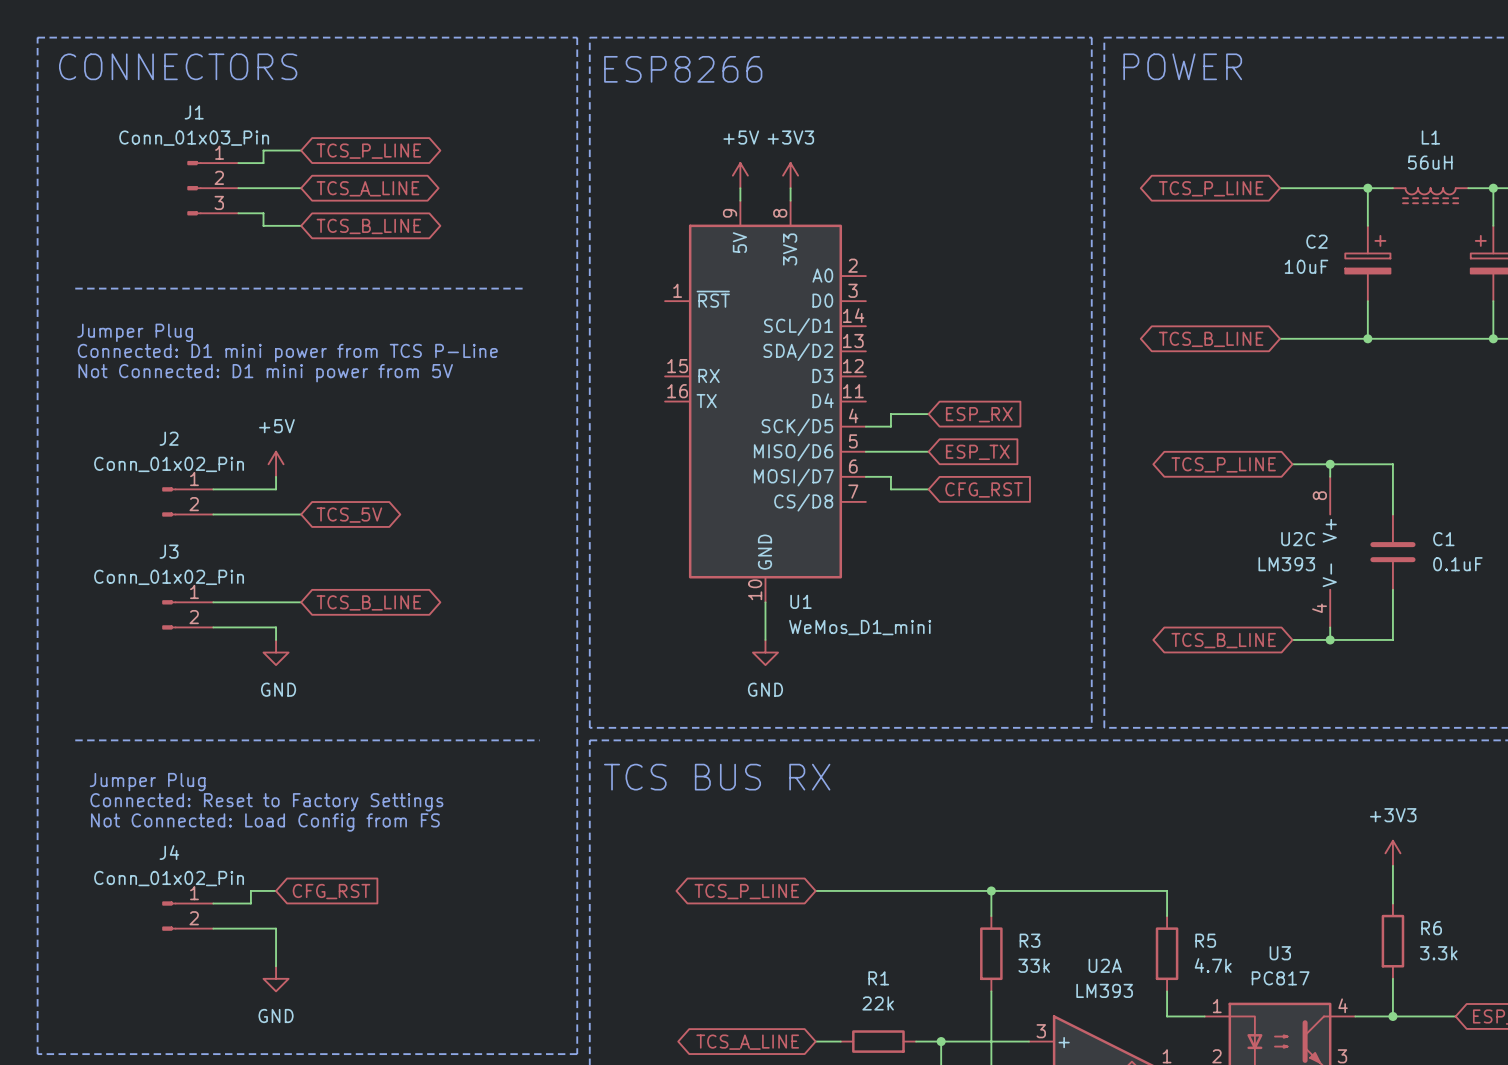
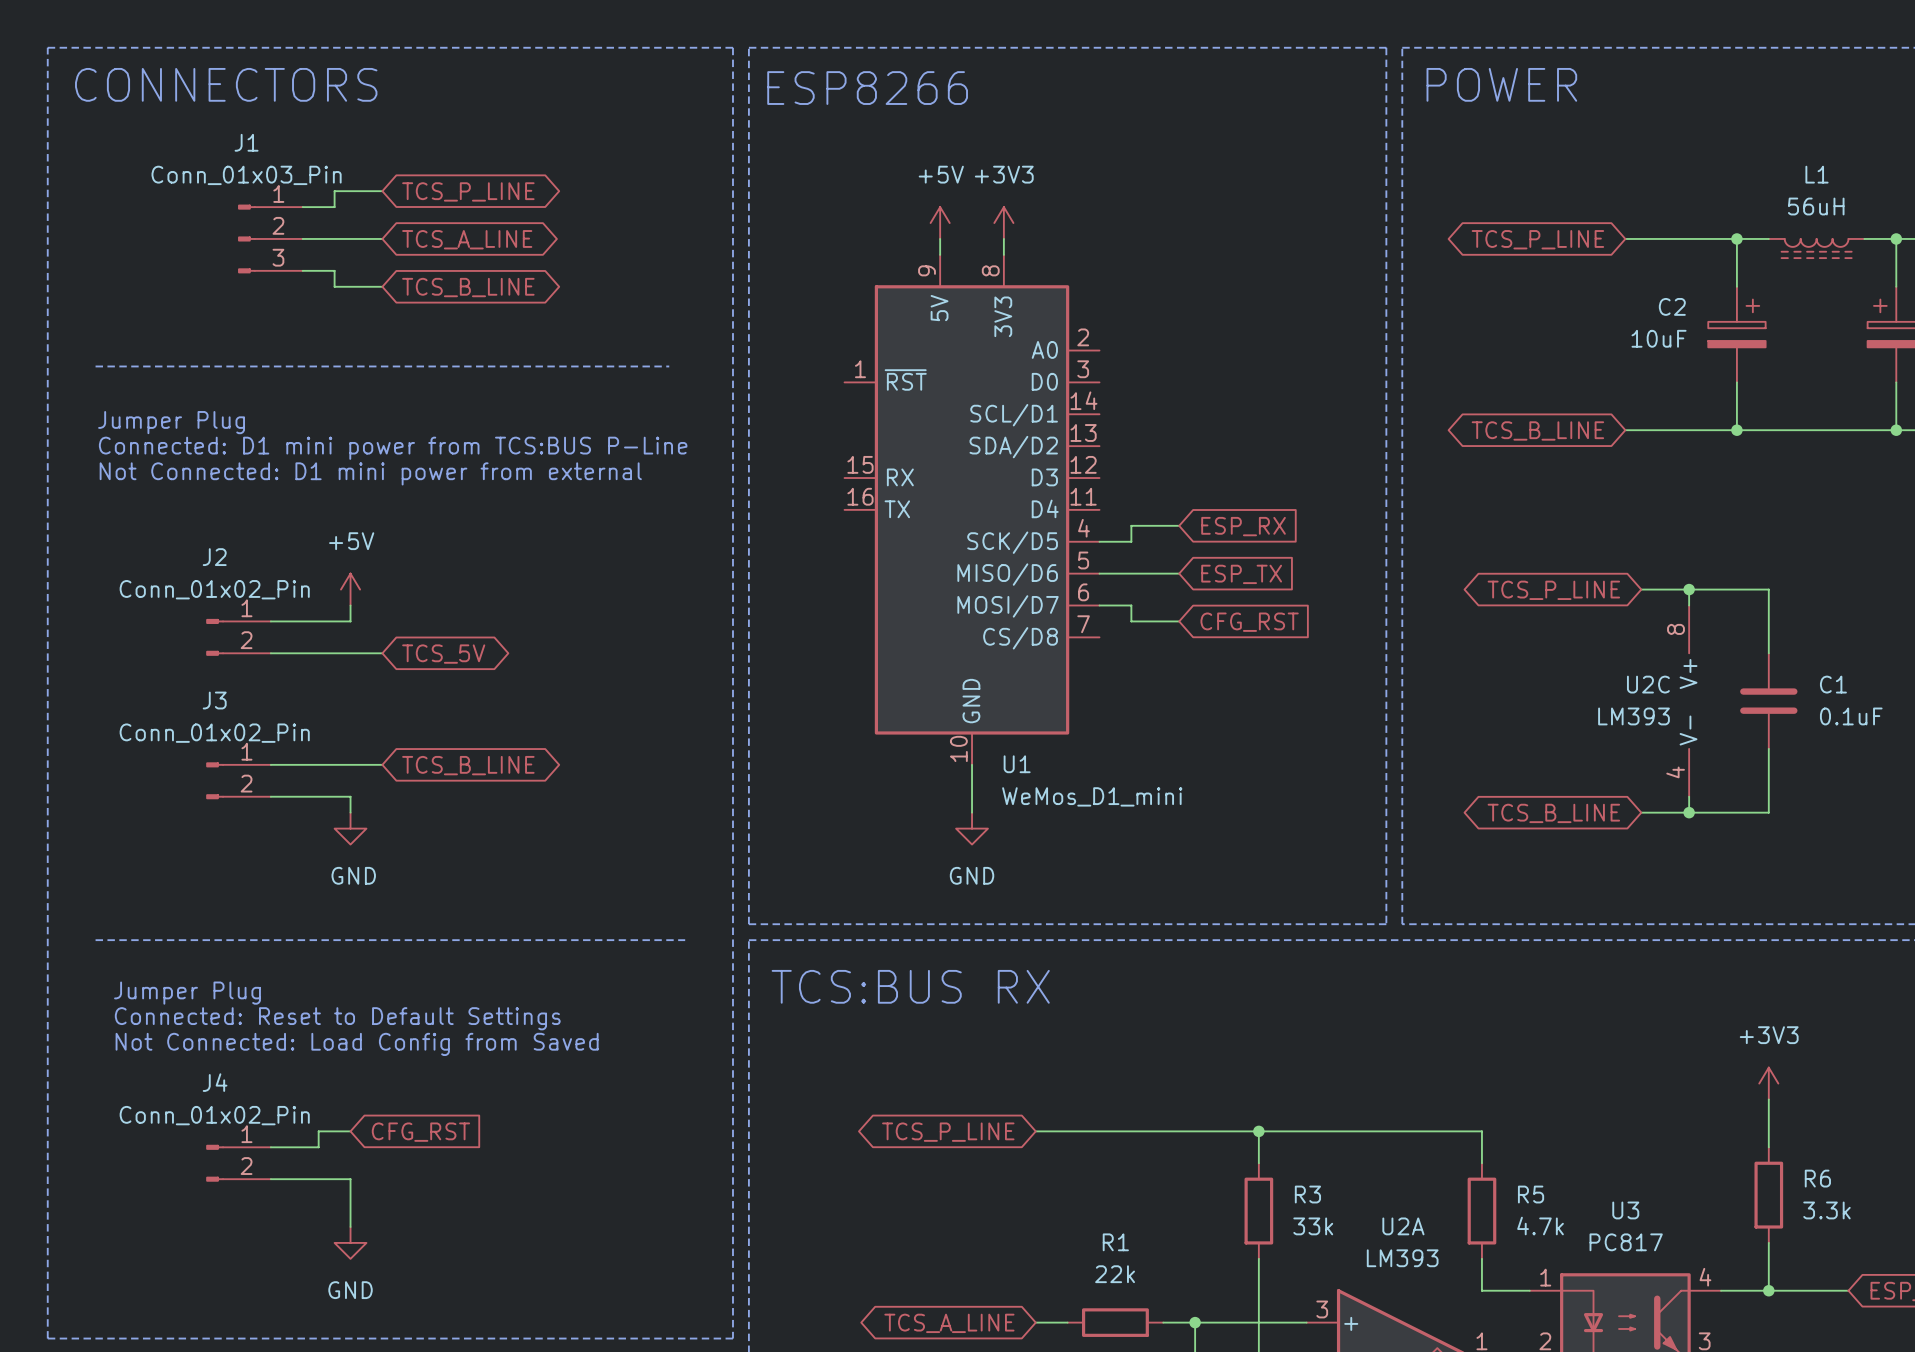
text: Connected: D1 mini power from TCS P-Line (287, 353) -> Connected: D1 mini power from TCS:BUS P-Line (393, 448)
text: Not Connected: D1 mini power from 5V (265, 373) -> Not Connected: D1 mini power from external (370, 473)
text: TCS BUS RX (717, 777) -> TCS:BUS RX (910, 986)
text: Connected: Reset to Factory Settings (266, 802) -> Connected: Reset to Default Settings (337, 1018)
text: Not Connected: Load Config from FS (265, 822) -> Not Connected: Load Config from Saved (357, 1044)

